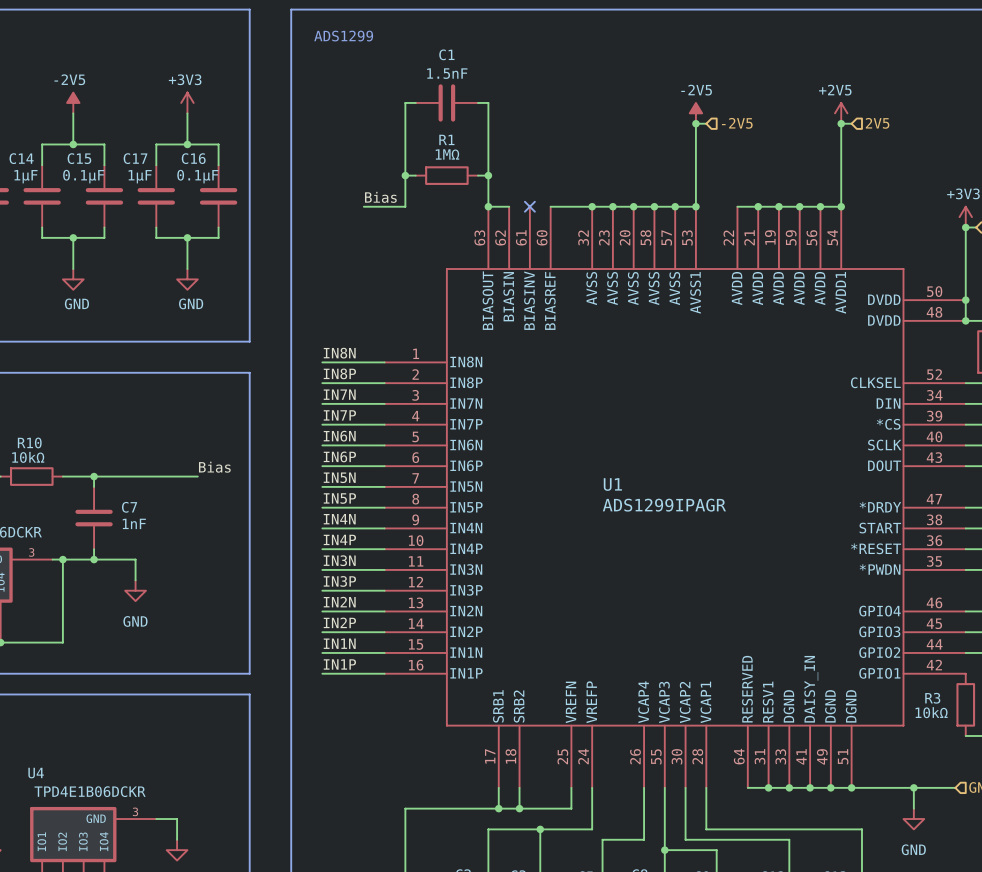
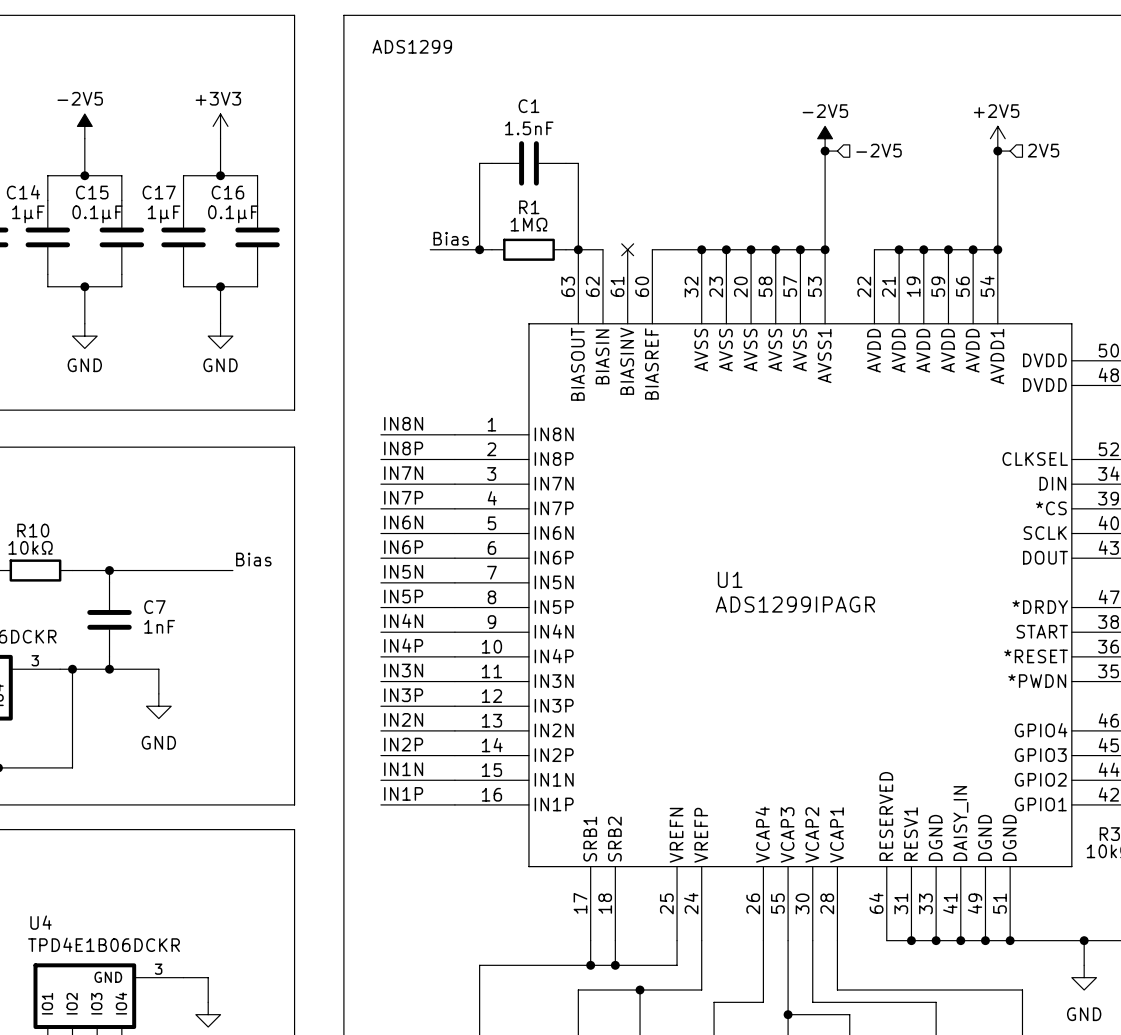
wire: (415, 102) (405, 102) (405, 134) -> (491, 163) (479, 163)
C1 position: (446, 102) -> (528, 163)
wire: (478, 102) (488, 102) (488, 134) -> (565, 163) (578, 163)
wire: (405, 175) (415, 175) -> (479, 249) (491, 249)
junction position: (405, 175) -> (479, 249)
R1 position: (446, 175) -> (528, 249)
wire: (478, 175) (488, 175) -> (565, 249) (578, 249)
junction: (488, 175) -> none

